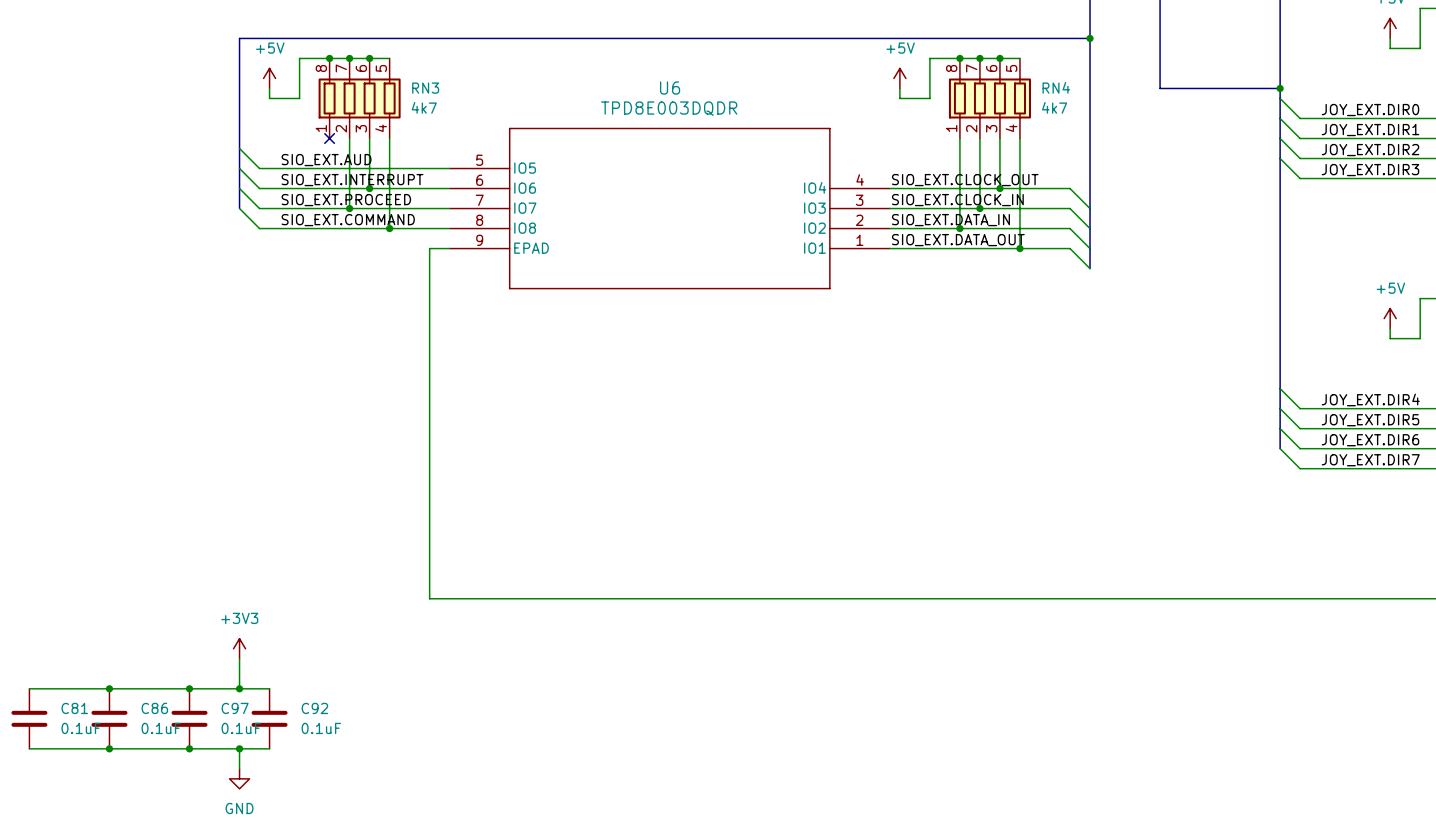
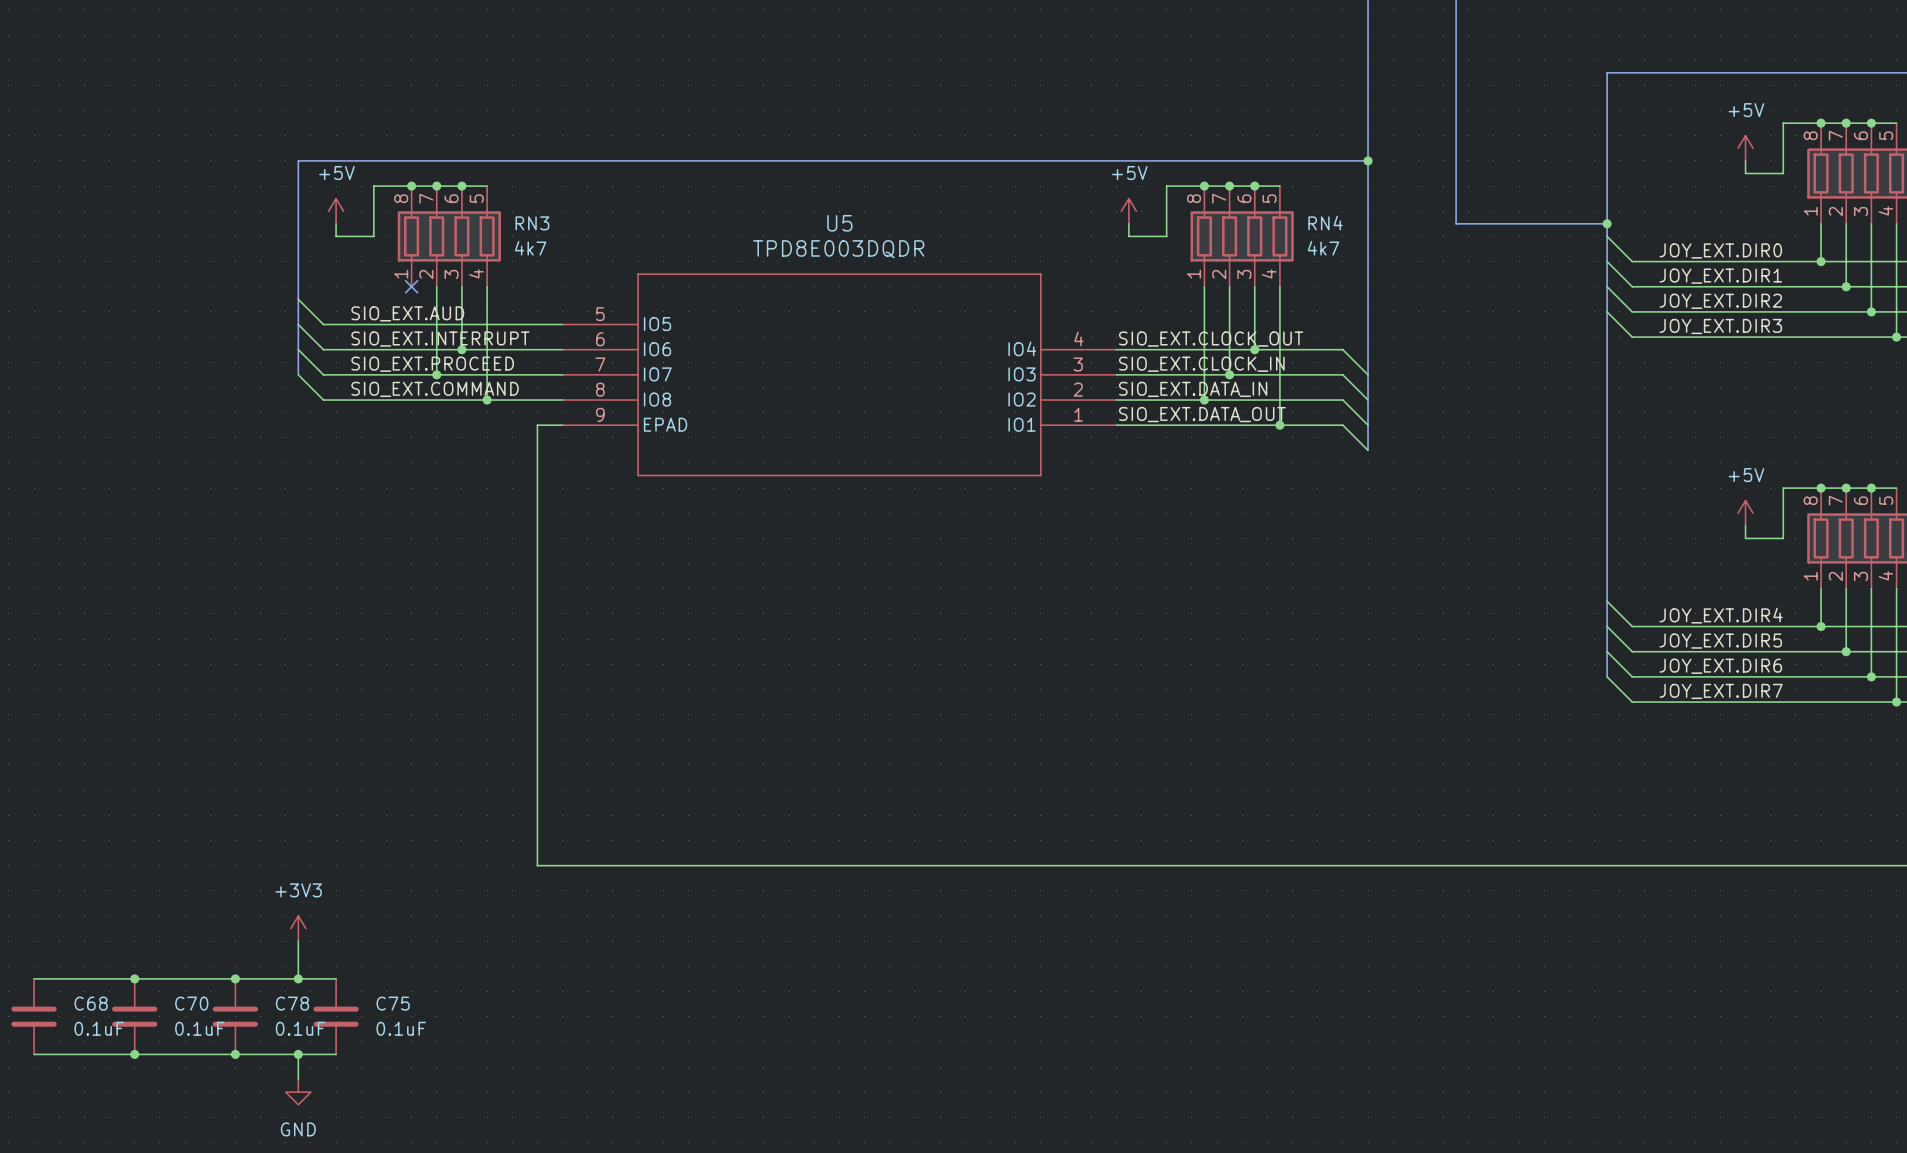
U6 name: U6 (670, 88) -> U5 (839, 223)
C81 name: C81 (74, 708) -> C68 (91, 1003)
C86 name: C86 (154, 708) -> C70 (191, 1003)
C97 name: C97 (235, 708) -> C78 (292, 1003)
C92 name: C92 (314, 708) -> C75 (393, 1003)

